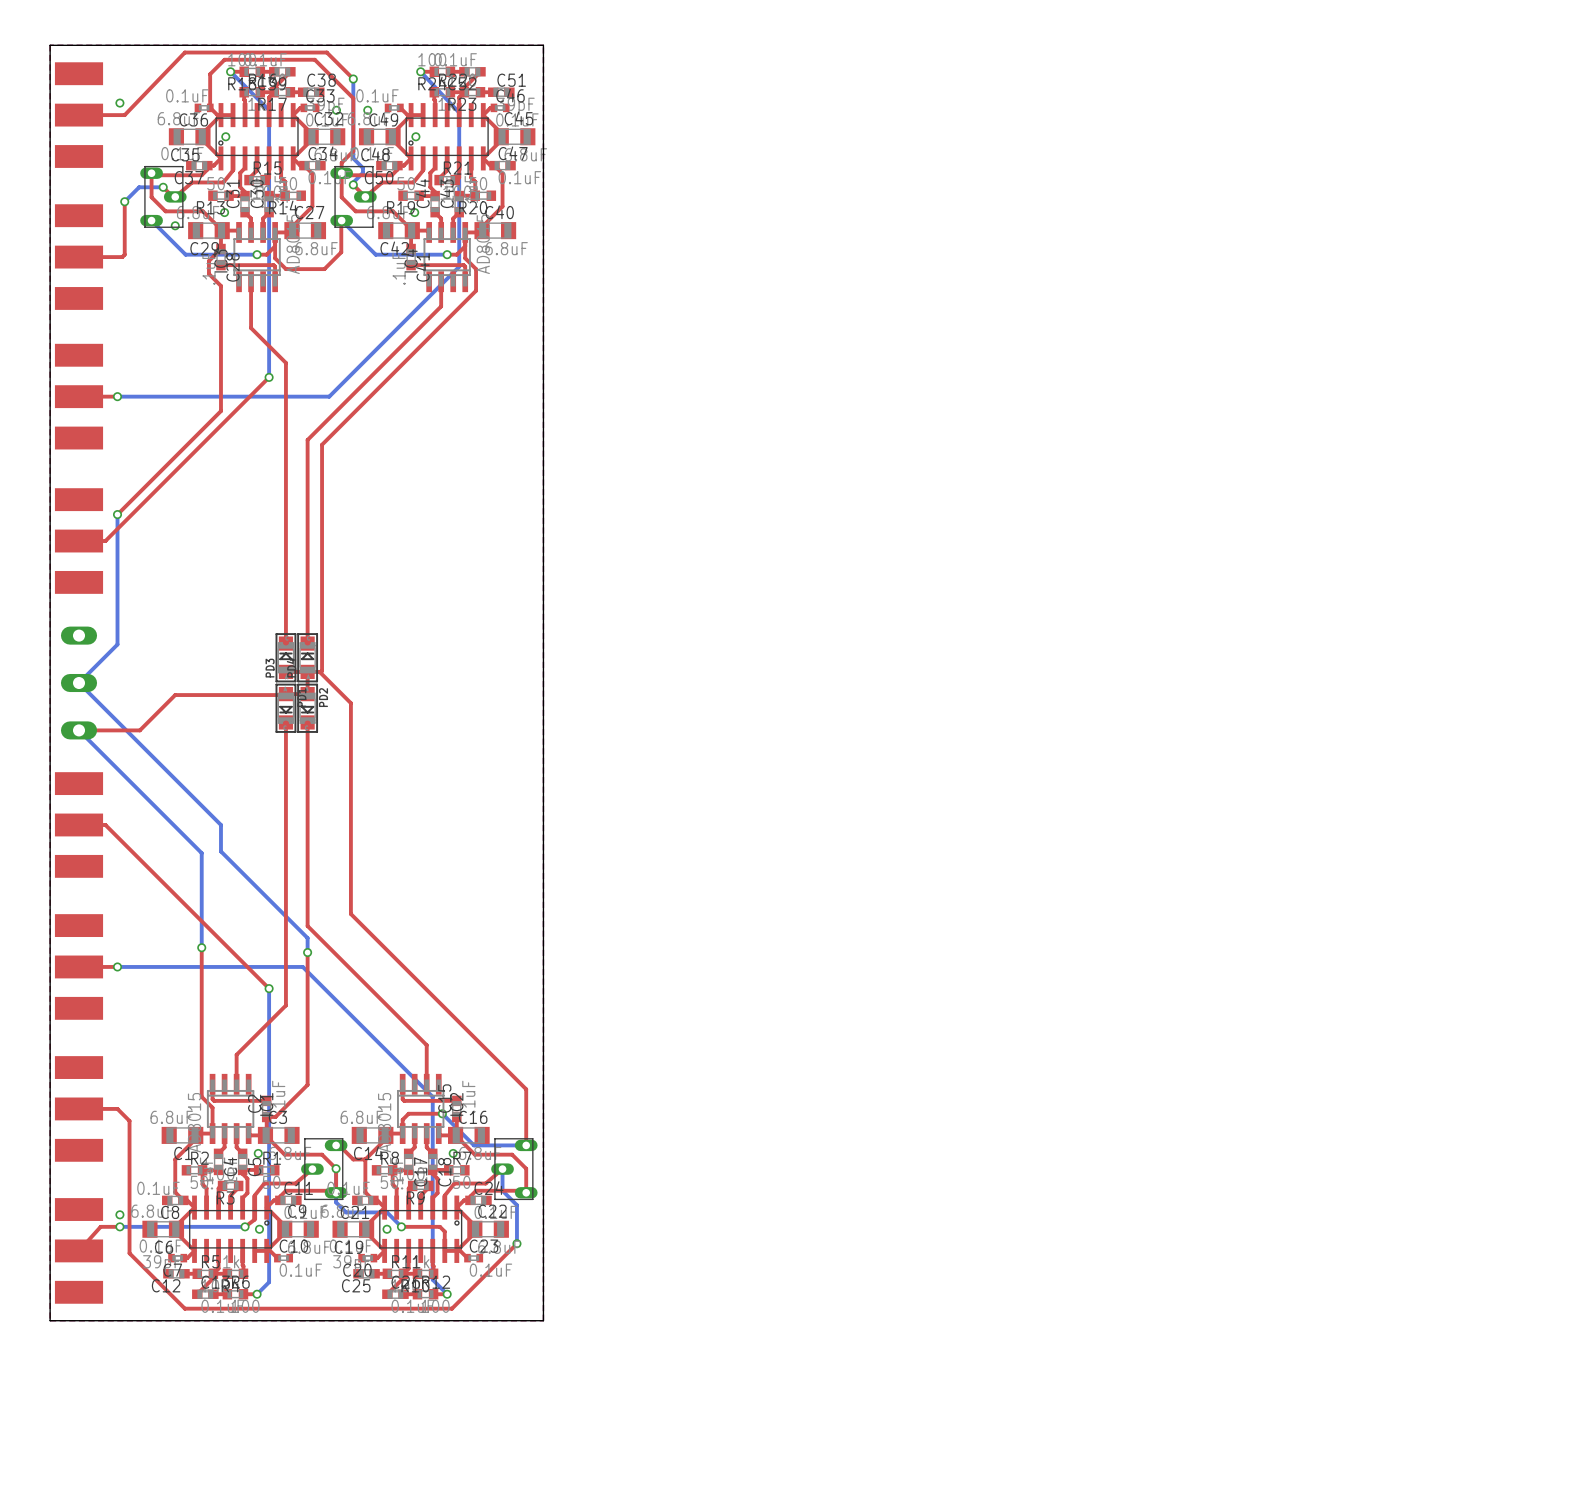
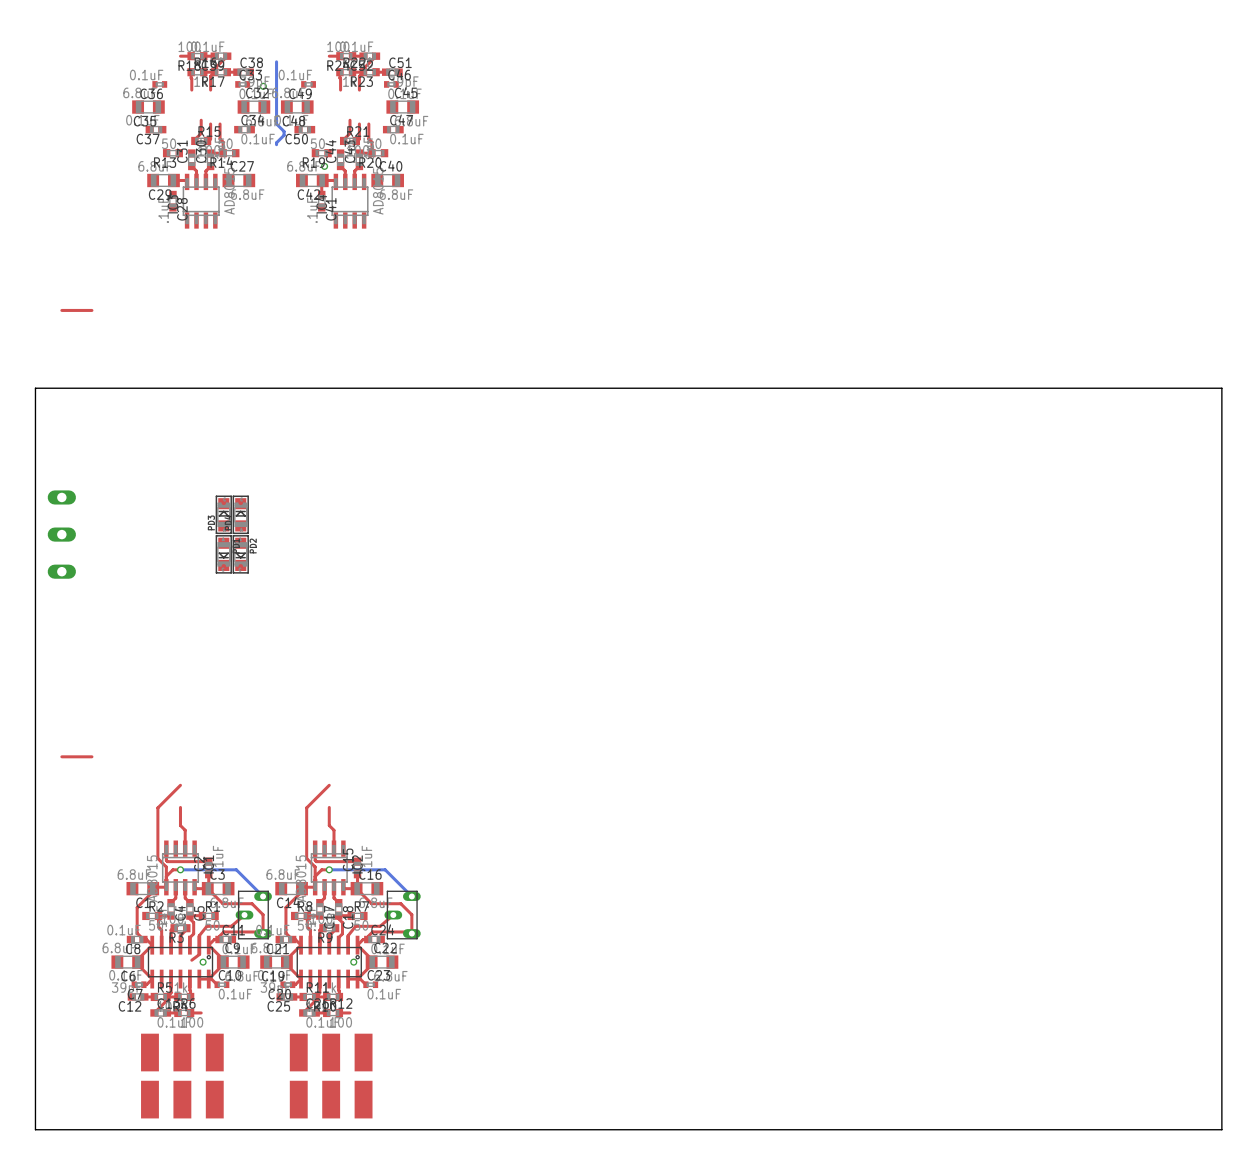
board edge: (50, 45) (543, 45) (543, 1320) (50, 1320) (50, 45) -> none
bottom track: (230, 71) (269, 110) (269, 377) -> none
via: (230, 71) -> none
bottom track: (420, 71) (459, 112) (459, 266) (329, 396) (117, 396) -> none
via: (420, 71) -> none
top track: (353, 79) (326, 52) (184, 52) (124, 115) (79, 115) -> none
via: (353, 79) -> none
via: (119, 103) -> none
top track: (303, 107) (300, 107) (293, 115) (311, 133) (311, 140) (293, 158) (312, 173) (312, 206) (291, 227) (291, 232) (275, 232) (275, 258) (285, 269) (324, 269) (341, 252) (341, 220) -> none
top track: (400, 107) (407, 115) (423, 115) -> none
top track: (493, 107) (490, 107) (483, 115) (501, 133) (501, 140) (483, 158) (502, 173) (502, 206) (482, 227) (482, 232) (465, 232) (465, 258) (476, 269) (476, 290) (322, 444) (322, 670) (285, 671) -> none
via: (367, 110) -> none
part: (79, 115) -> none
top track: (220, 115) (202, 133) (202, 140) (220, 158) (213, 165) (207, 165) (207, 169) (201, 175) (153, 175) (151, 173) (151, 197) (165, 211) (202, 211) (222, 230) (220, 249) (208, 261) (208, 273) (220, 285) (220, 411) (117, 514) -> none
top track: (233, 115) (217, 115) (210, 107) (210, 74) (224, 59) (314, 59) (353, 98) (353, 151) (341, 162) (341, 197) (355, 211) (393, 211) (412, 230) -> none
top track: (411, 115) (393, 133) (393, 140) (411, 158) (403, 165) (397, 165) (397, 169) (391, 175) (343, 175) (341, 173) -> none
via: (225, 136) -> none
part: (257, 136) -> none
via: (415, 136) -> none
part: (447, 136) -> none
top track: (233, 158) (233, 170) (223, 182) (192, 182) (175, 196) (172, 196) (163, 187) -> none
top track: (245, 158) (245, 168) (240, 172) (240, 187) (245, 192) (245, 196) (229, 195) -> none
top track: (423, 158) (423, 170) (413, 182) (382, 182) (365, 196) (353, 184) -> none
top track: (435, 158) (435, 168) (430, 172) (430, 187) (435, 192) (435, 196) (419, 195) -> none
via: (353, 184) -> none
bottom track: (163, 187) (139, 187) (124, 201) -> none
via: (163, 187) -> none
part: (163, 196) -> none
part: (353, 196) -> none
top track: (124, 201) (124, 254) (122, 257) (79, 257) -> none
via: (124, 201) -> none
via: (224, 212) -> none
bottom track: (151, 220) (185, 254) (257, 254) -> none
bottom track: (341, 220) (375, 254) (447, 254) -> none
via: (175, 225) -> none
top track: (275, 246) (266, 254) (257, 254) -> none
top track: (465, 246) (456, 254) (447, 254) -> none
via: (257, 254) -> none
via: (447, 254) -> none
part: (79, 257) -> none
top track: (220, 265) (273, 265) (275, 281) -> none
top track: (411, 265) (463, 265) (465, 281) -> none
top track: (251, 281) (251, 328) (285, 362) (285, 643) -> none
top track: (441, 281) (441, 306) (307, 439) (307, 643) -> none
top track: (269, 377) (105, 541) (79, 541) -> none
via: (269, 377) -> none
part: (79, 396) -> none
via: (117, 396) -> none
board edge: none -> (35, 388) (1221, 388) (1221, 1129) (35, 1129) (35, 388)
bottom track: (117, 514) (117, 644) (79, 683) (220, 824) (220, 851) (307, 938) (307, 952) -> none
via: (117, 514) -> none
part: (79, 541) -> none
top track: (307, 671) (307, 694) (175, 695) (139, 730) (79, 730) -> none
top track: (319, 671) (350, 703) (350, 914) (526, 1089) (526, 1145) -> none
top track: (285, 722) (285, 1005) (236, 1054) (236, 1060) -> (180, 807) (180, 825) (185, 830)
top track: (307, 722) (307, 926) (426, 1045) (426, 1060) -> (329, 807) (329, 825) (333, 830)
bottom track: (79, 730) (201, 853) (201, 947) -> none
top track: (79, 824) (105, 824) (269, 988) -> none
part: (79, 824) -> none
top track: (201, 947) (201, 1032) -> (180, 785) (157, 807)
via: (201, 947) -> none
top track: (307, 952) (307, 1084) (275, 1116) (266, 1116) -> none
via: (307, 952) -> none
part: (79, 966) -> none
bottom track: (117, 966) (302, 966) (432, 1096) (432, 1279) (447, 1294) -> none
via: (117, 966) -> none
bottom track: (269, 988) (269, 1282) (257, 1294) -> none
via: (269, 988) -> none
top track: none -> (329, 785) (306, 807) (306, 858) (315, 867) (315, 876)
top track: (79, 1108) (117, 1108) (129, 1120) (129, 1253) (184, 1308) (451, 1308) (516, 1243) -> none
part: (79, 1108) -> none
top track: none -> (180, 869) (172, 869) (166, 876)
bottom track: none -> (180, 869) (236, 869) (263, 896)
top track: (408, 1113) (442, 1113) -> (319, 871) (329, 869)
bottom track: (442, 1113) (474, 1145) (526, 1145) -> (329, 869) (385, 869) (411, 896)
via position: (442, 1113) -> (329, 869)
top track: (336, 1145) (339, 1145) (353, 1159) (365, 1159) -> none
via position: (258, 1153) -> (180, 869)
via: (453, 1153) -> none
bottom track: (336, 1168) (336, 1202) (346, 1212) (387, 1212) (401, 1226) -> none
via: (336, 1168) -> none
bottom track: (502, 1169) (502, 1190) (516, 1205) (516, 1243) -> none
via: (119, 1214) -> none
top track: (119, 1226) (100, 1226) (79, 1250) -> none
bottom track: (119, 1226) (245, 1226) -> none
via: (119, 1226) -> none
via: (245, 1226) -> none
top track: (401, 1226) (439, 1226) (444, 1231) (444, 1250) -> none
via: (401, 1226) -> none
via: (387, 1229) -> none
via: none -> (353, 962)
via: (516, 1243) -> none
part: (79, 1250) -> none
via: (257, 1294) -> none
via: (447, 1294) -> none
part: none -> (182, 1052)
part: none -> (331, 1052)
part: none -> (182, 1099)
part: none -> (331, 1099)

